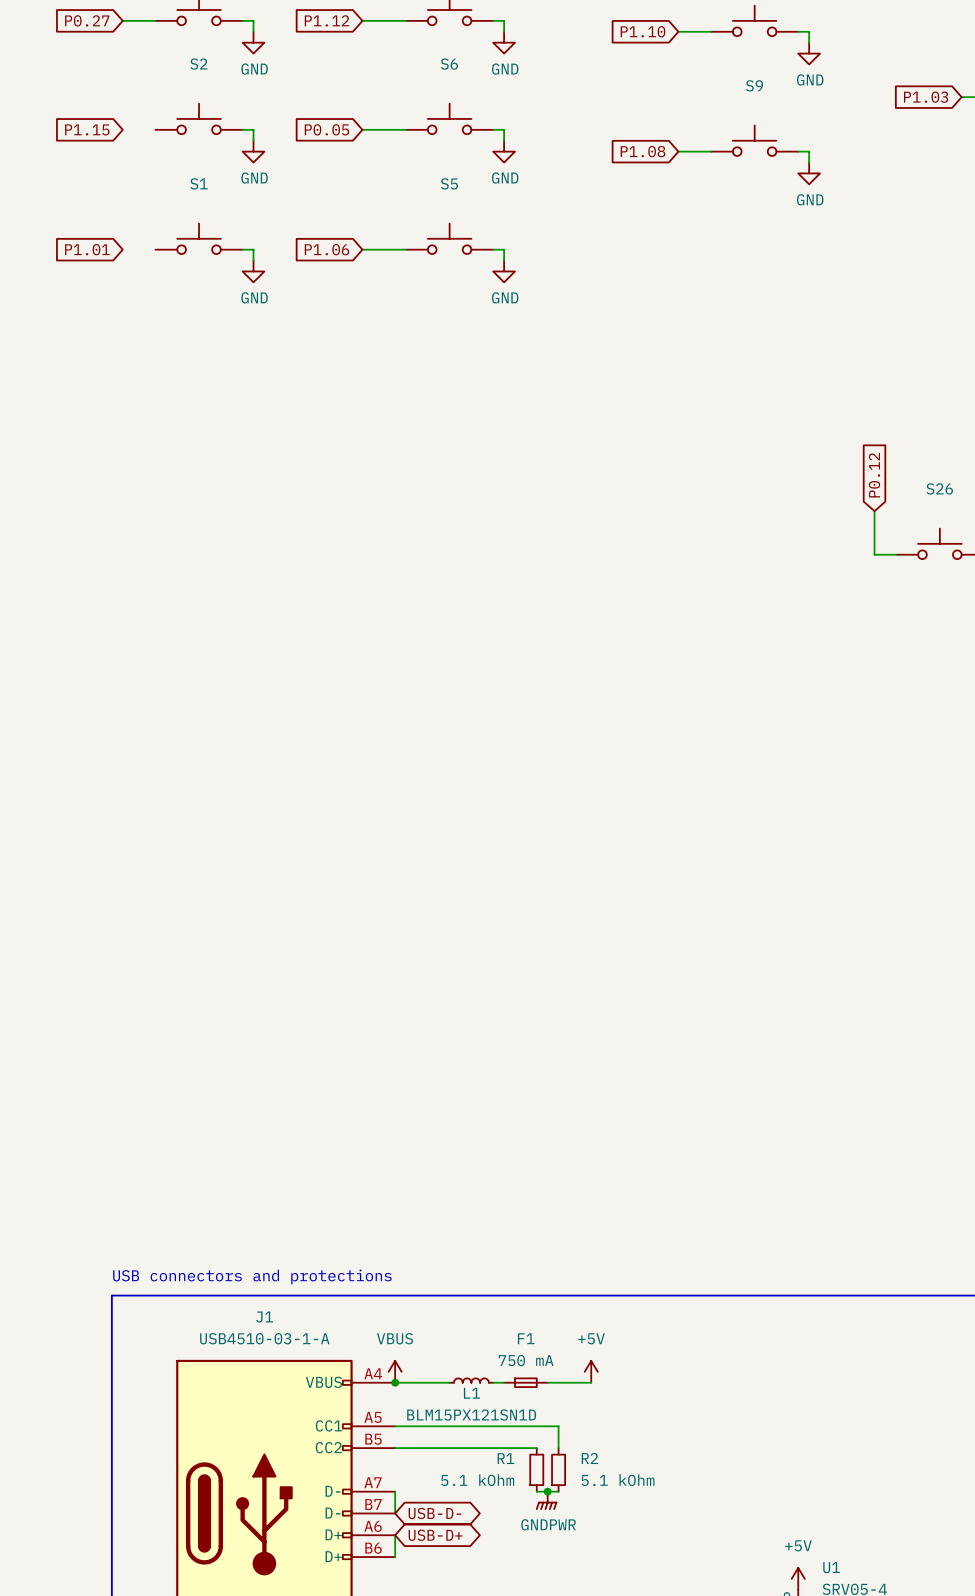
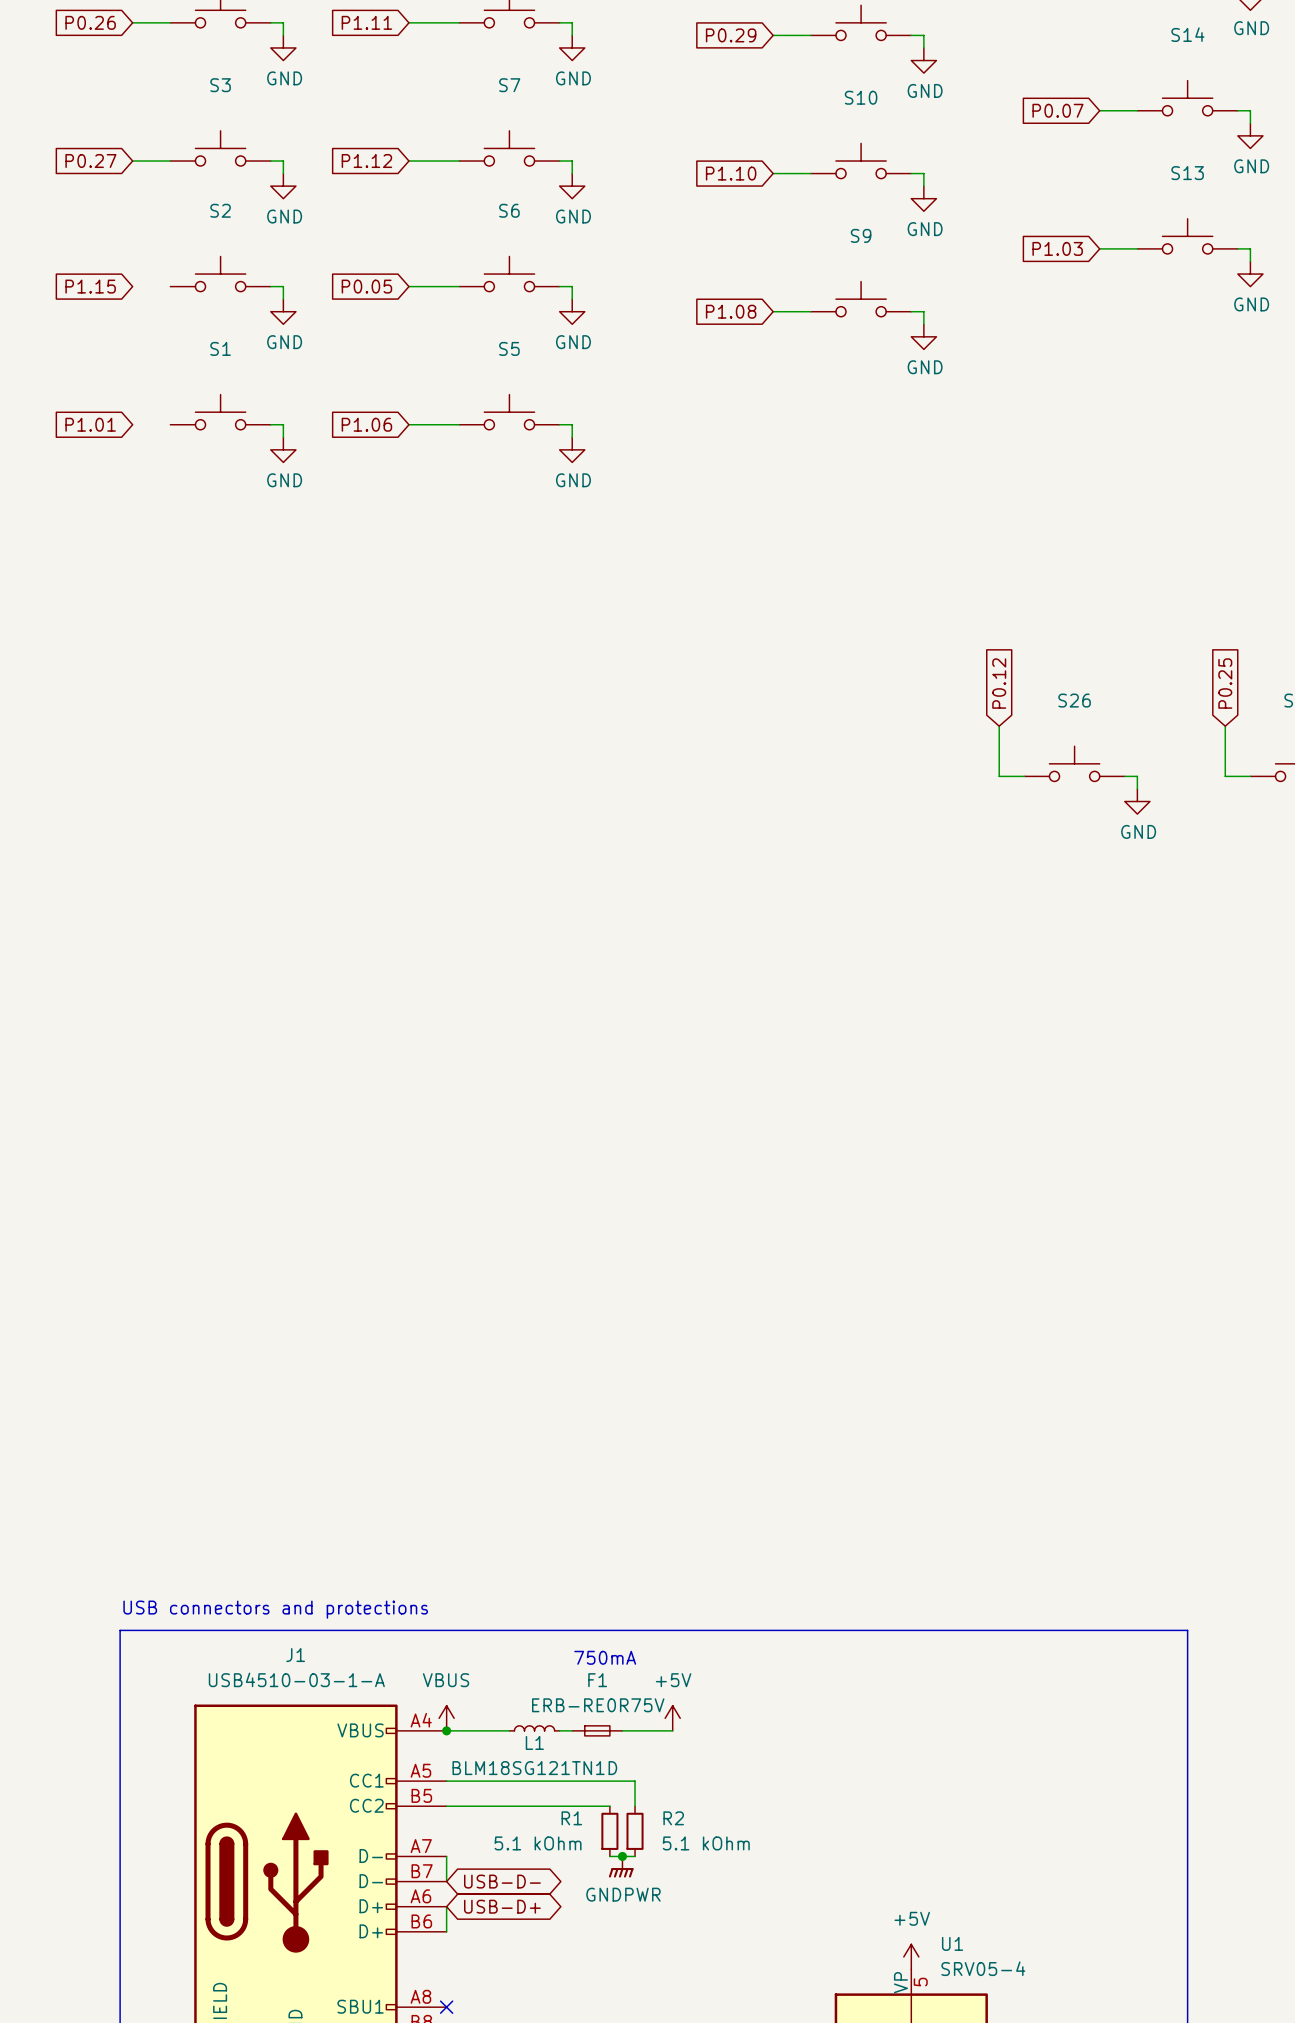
text: none -> 750mA (605, 1657)
F1 value: 750 mA (526, 1360) -> ERB-RE0R75V (598, 1705)
L1 value: BLM15PX121SN1D (471, 1415) -> BLM18SG121TN1D (534, 1768)

